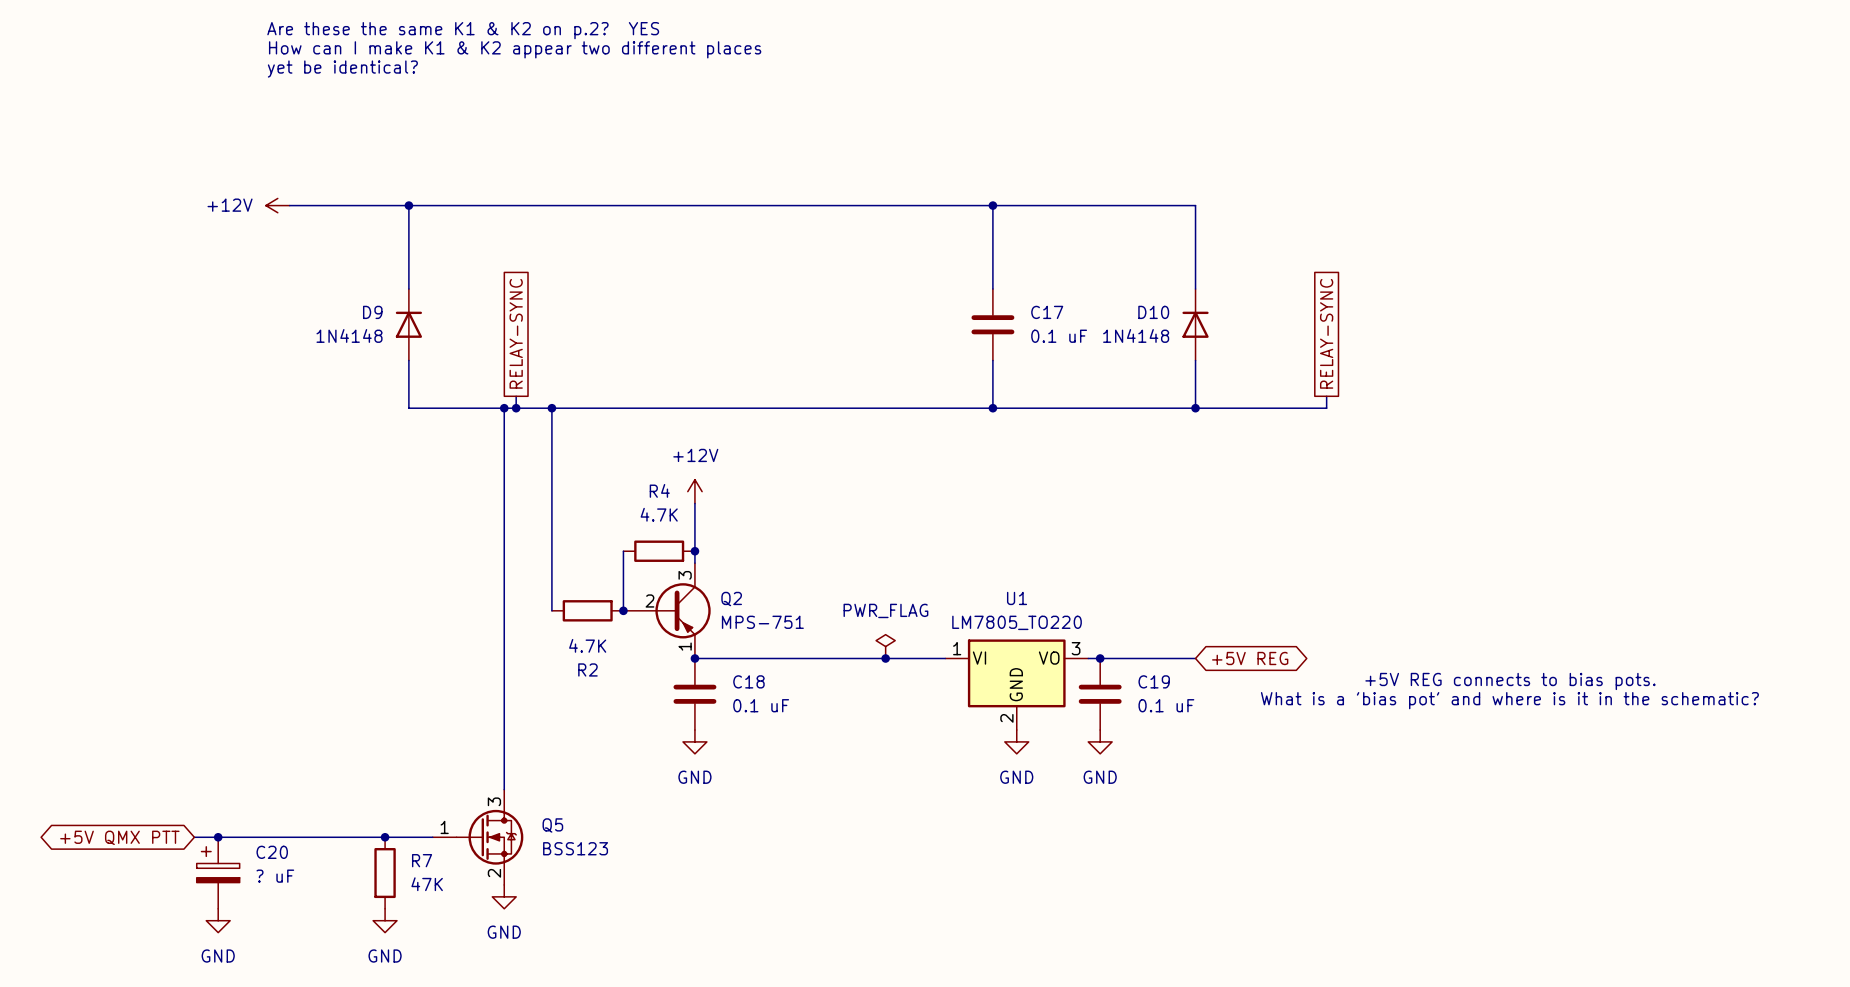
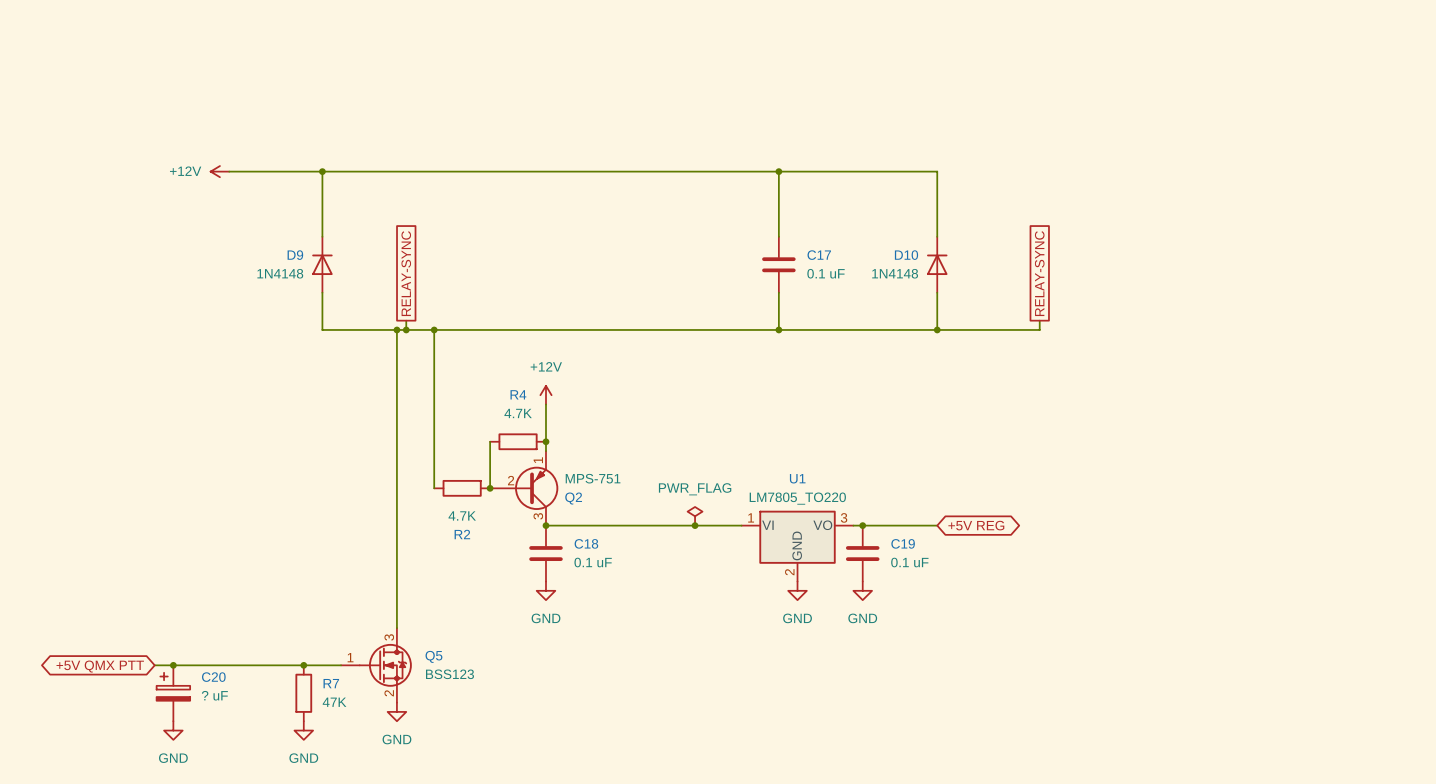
text: Are these the same K1 & K2 on p.2? YES (463, 30) -> none
text: How can I make K1 & K2 appear two different places (515, 49) -> none
text: yet be identical? (342, 69) -> none
Q2 flip: as is (683, 610) -> up-down (536, 488)
text: +5V REG connects to bias pots. (1510, 681) -> none
text: What is a 'bias pot' and where is it in the schematic? (1509, 700) -> none

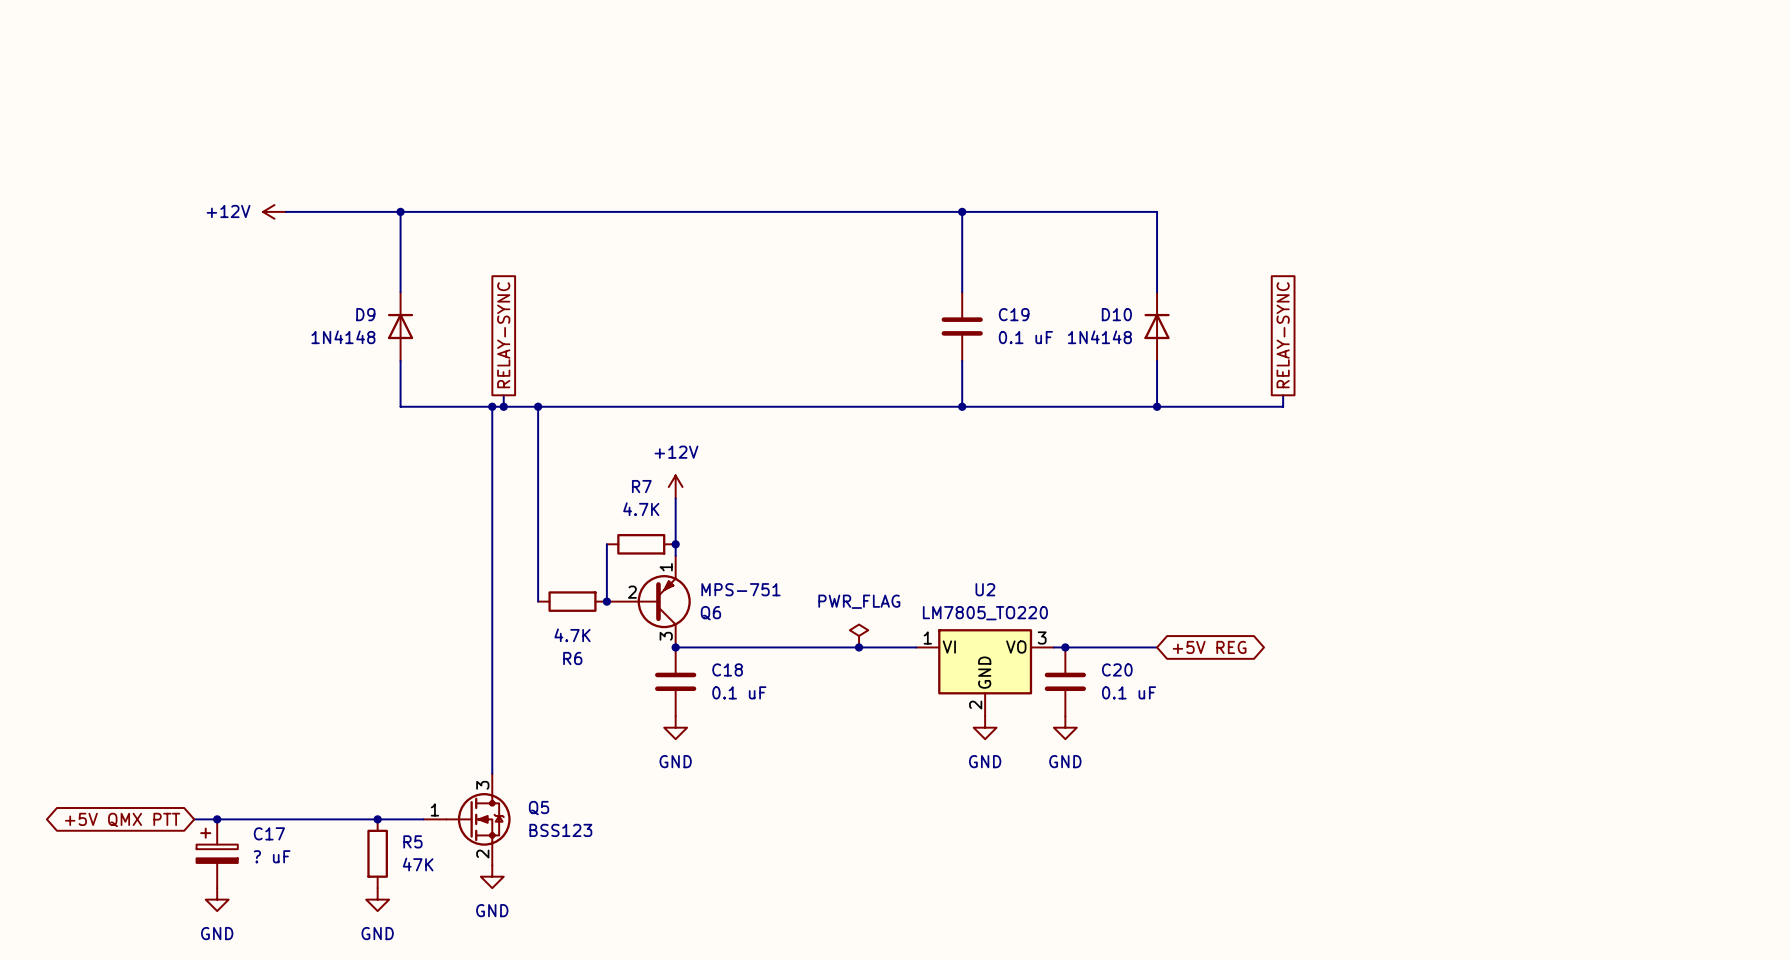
C17 name: C17 (819, 255) -> C19 (1014, 314)
R4 name: R4 (518, 394) -> R7 (641, 486)
U1 name: U1 (797, 478) -> U2 (985, 589)
Q2 name: Q2 (573, 498) -> Q6 (710, 613)
R2 name: R2 (462, 534) -> R6 (572, 658)
C19 name: C19 (903, 543) -> C20 (1117, 669)
C20 name: C20 (213, 677) -> C17 (269, 833)
R7 name: R7 (331, 683) -> R5 (412, 841)

